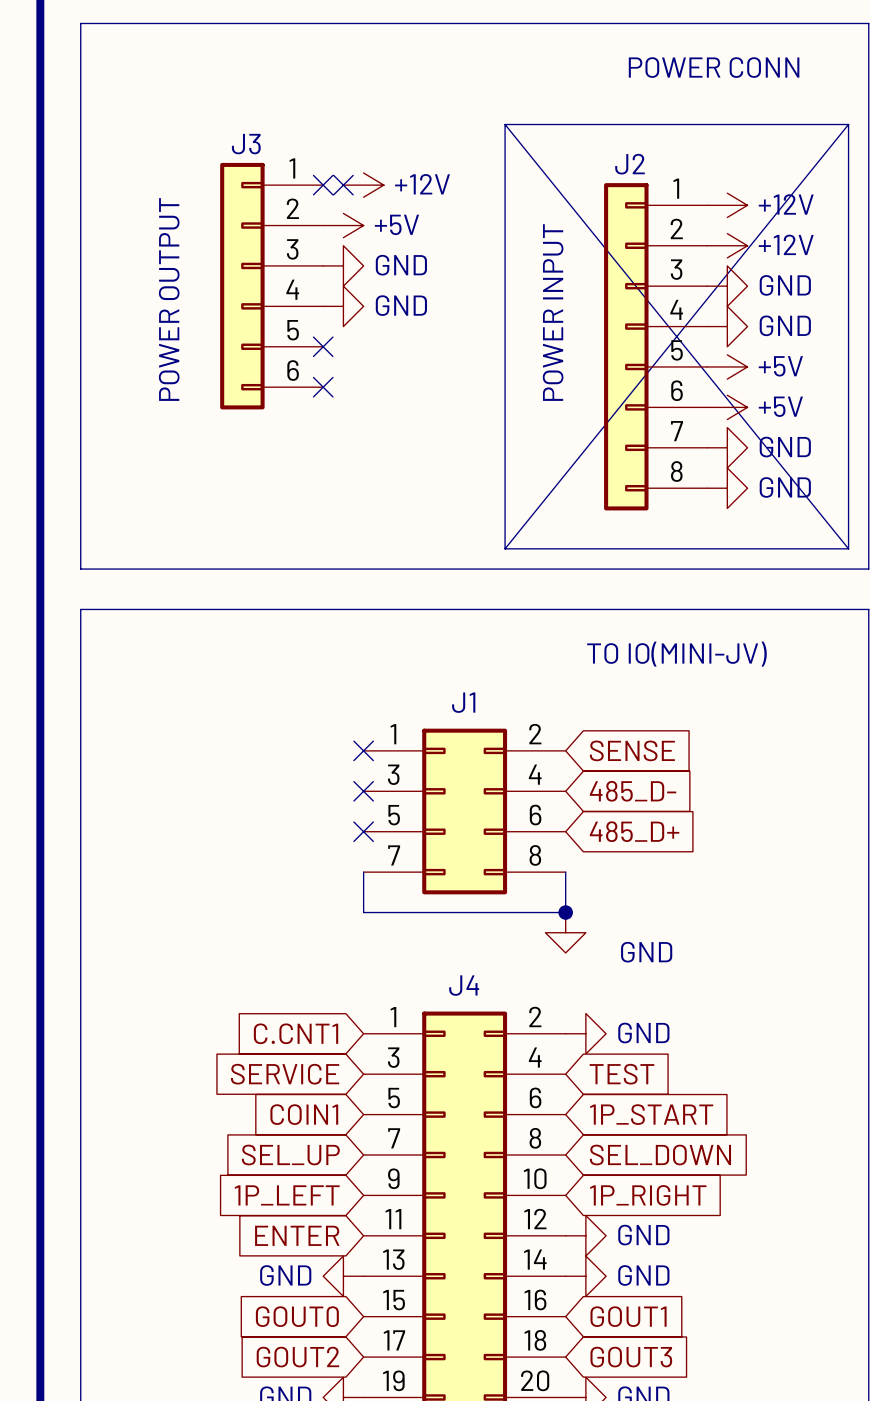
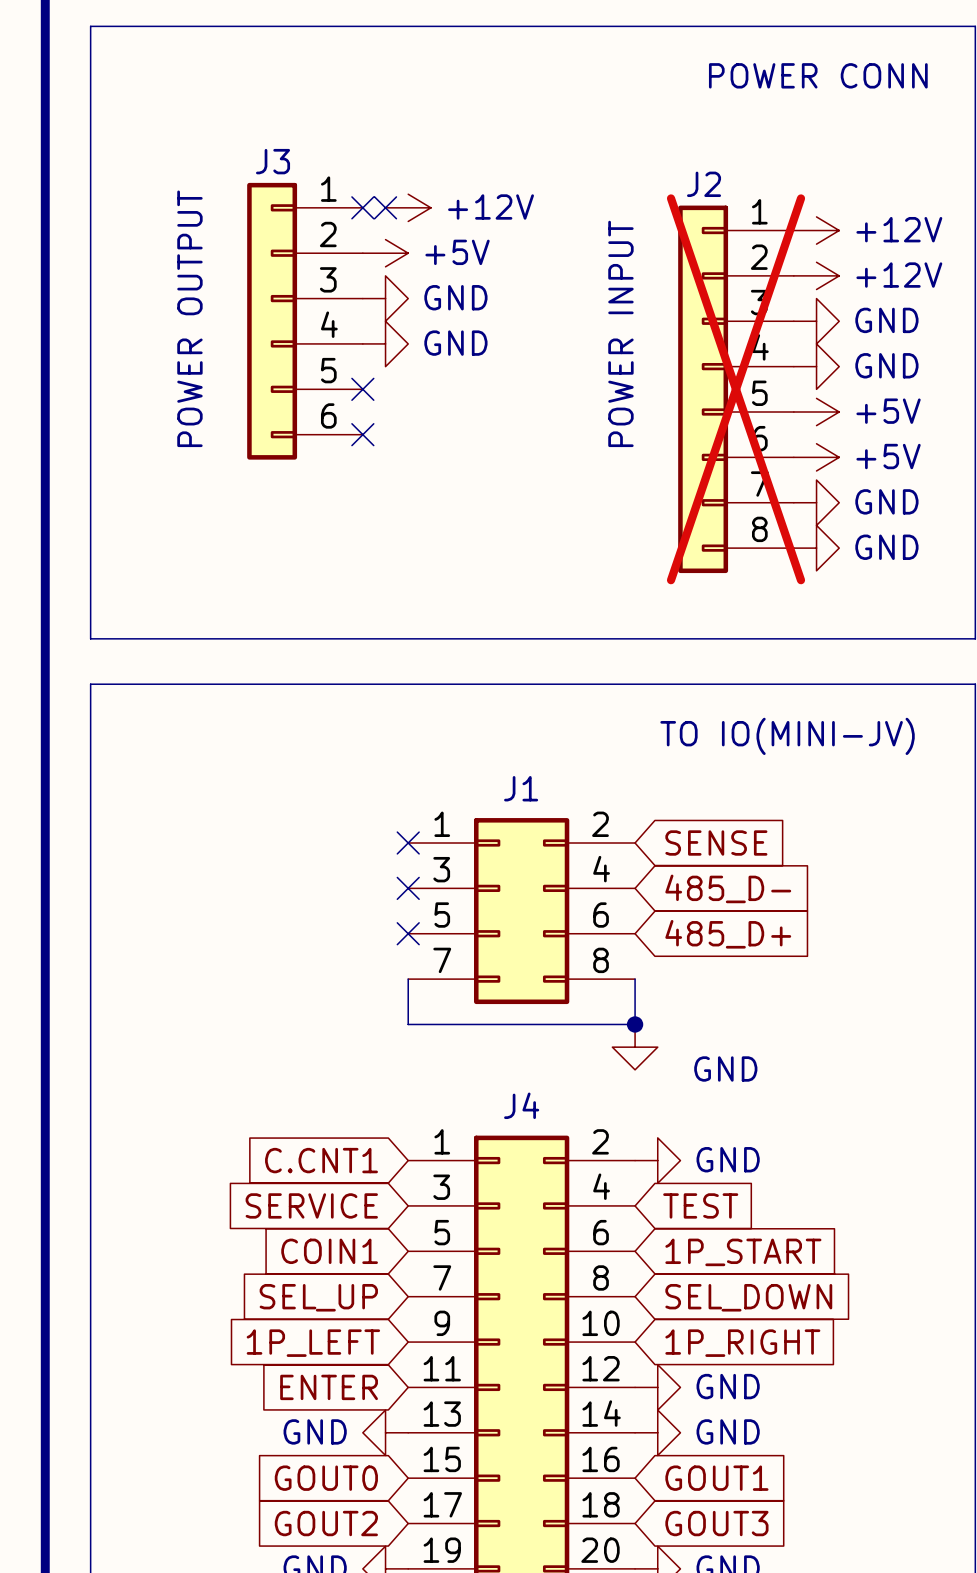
line: (505, 124) (848, 548) -> none
line: (505, 124) (848, 124) -> none
line: (505, 124) (505, 548) -> none
line: (848, 124) (505, 548) -> none
line: (848, 124) (848, 548) -> none
J2 do-not-place cross: none -> (736, 389)
line: (505, 548) (848, 548) -> none

